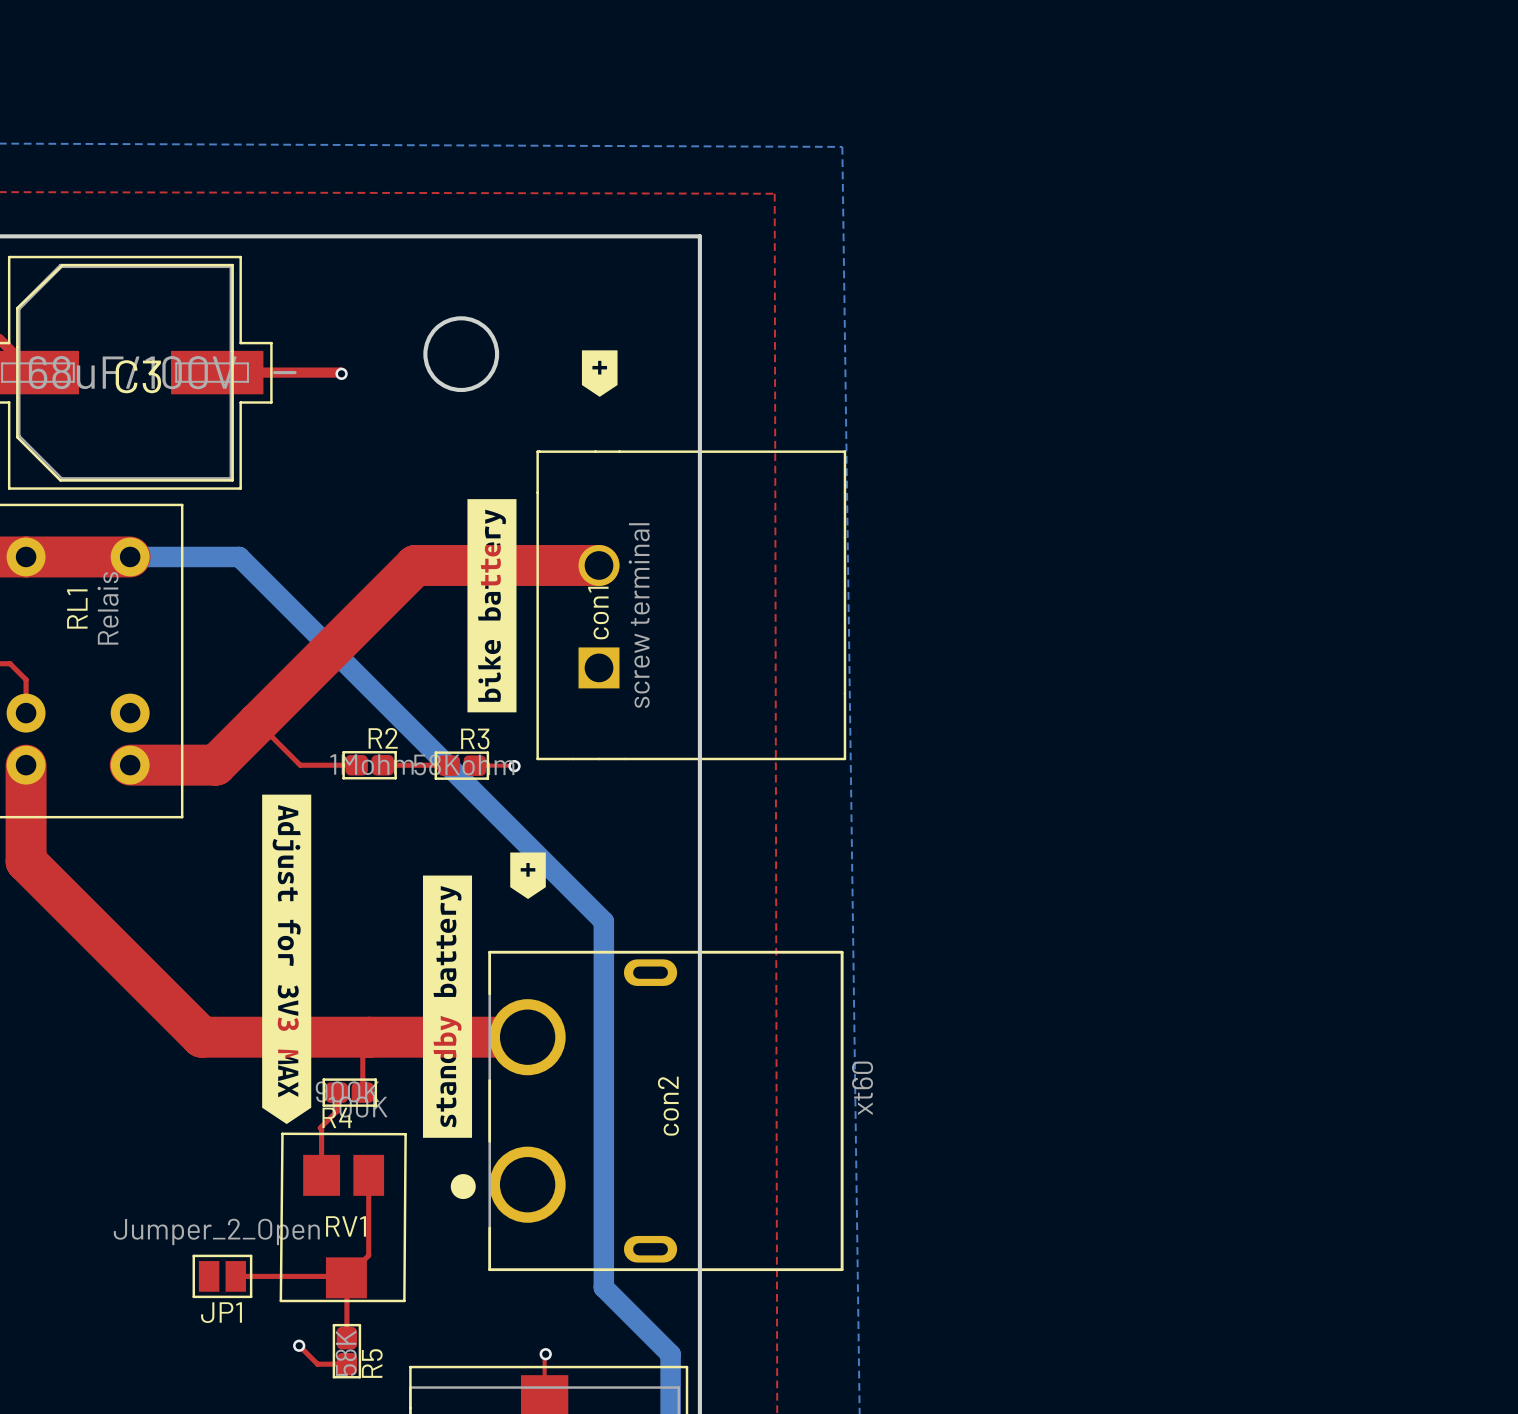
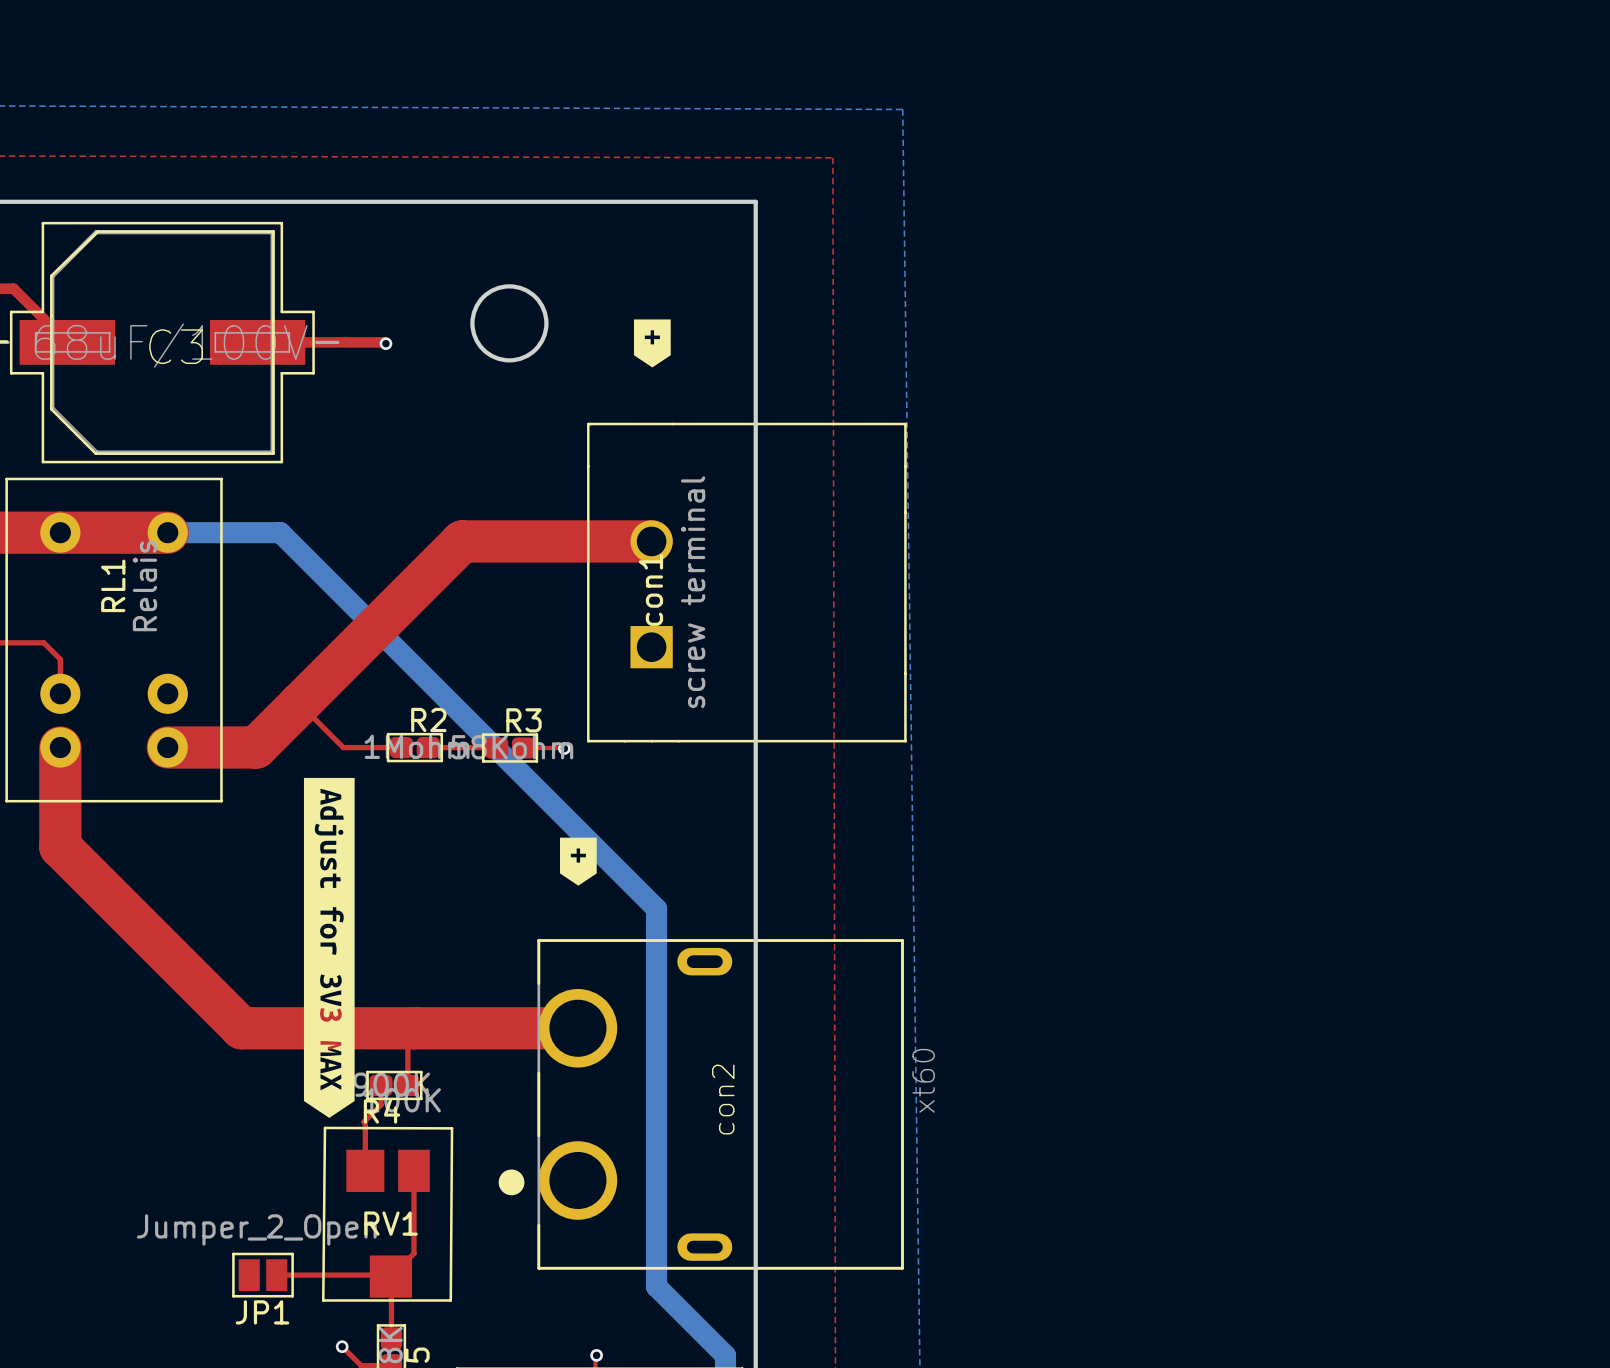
drawing: [467, 499, 517, 713] -> none
drawing: [422, 875, 473, 1138] -> none

